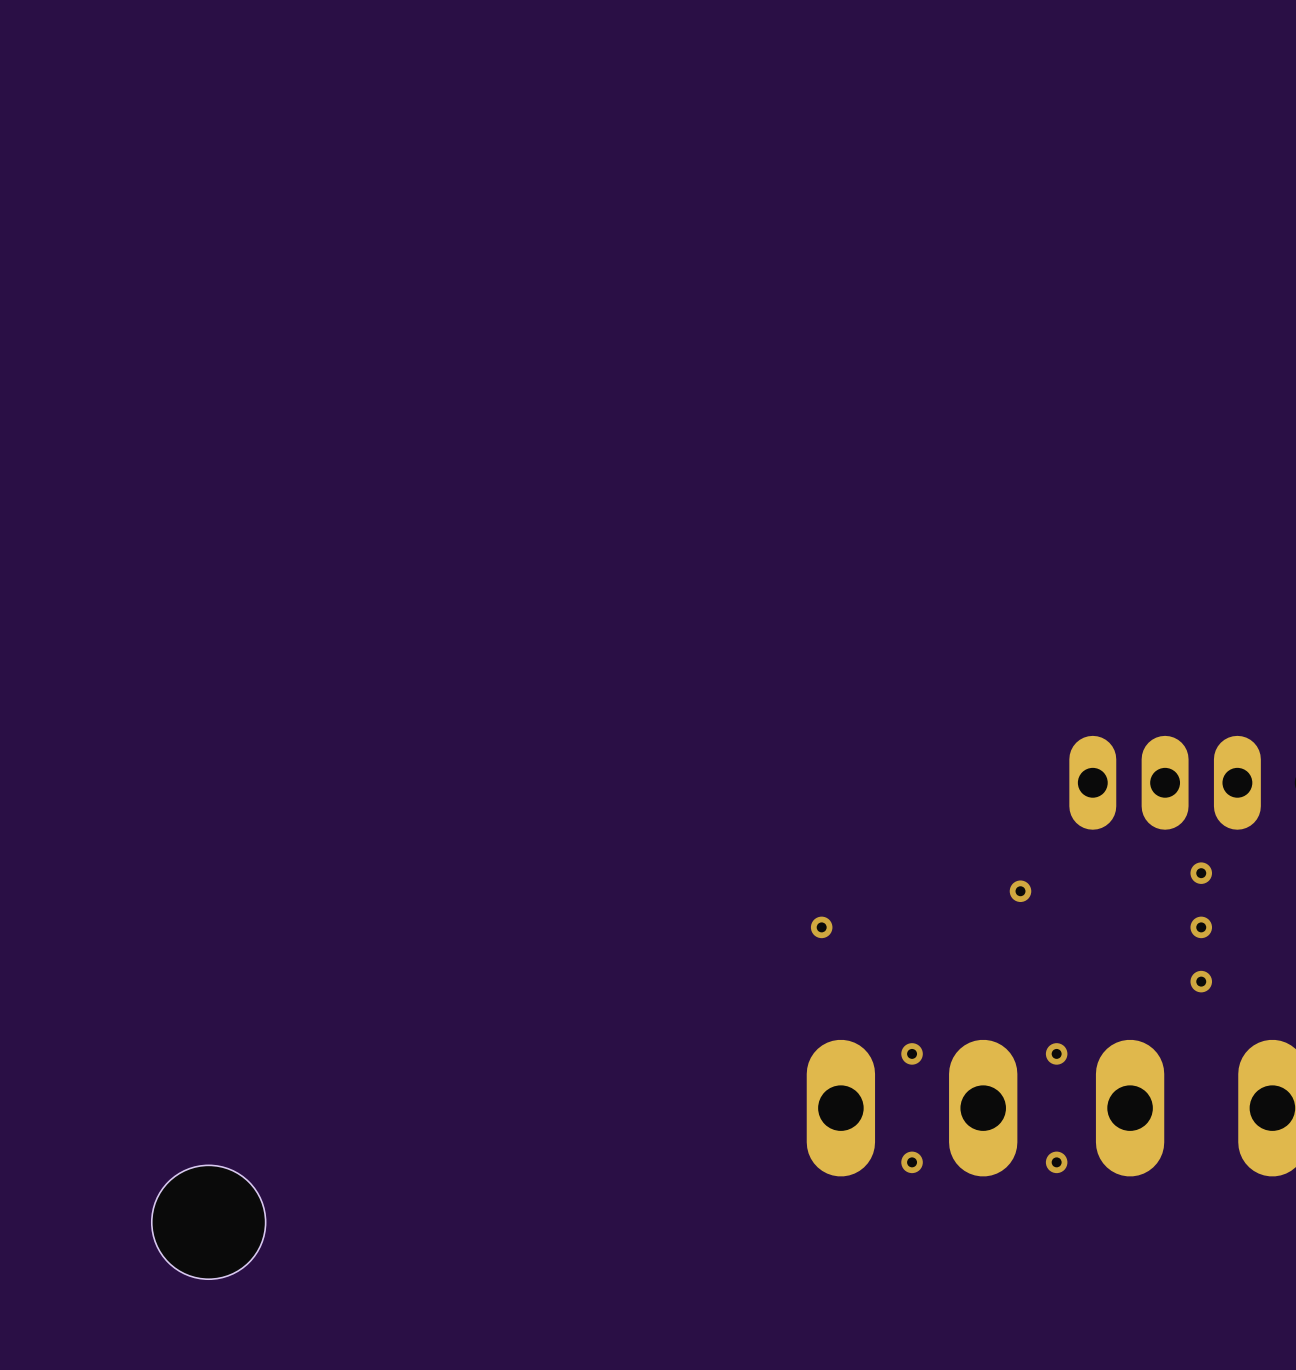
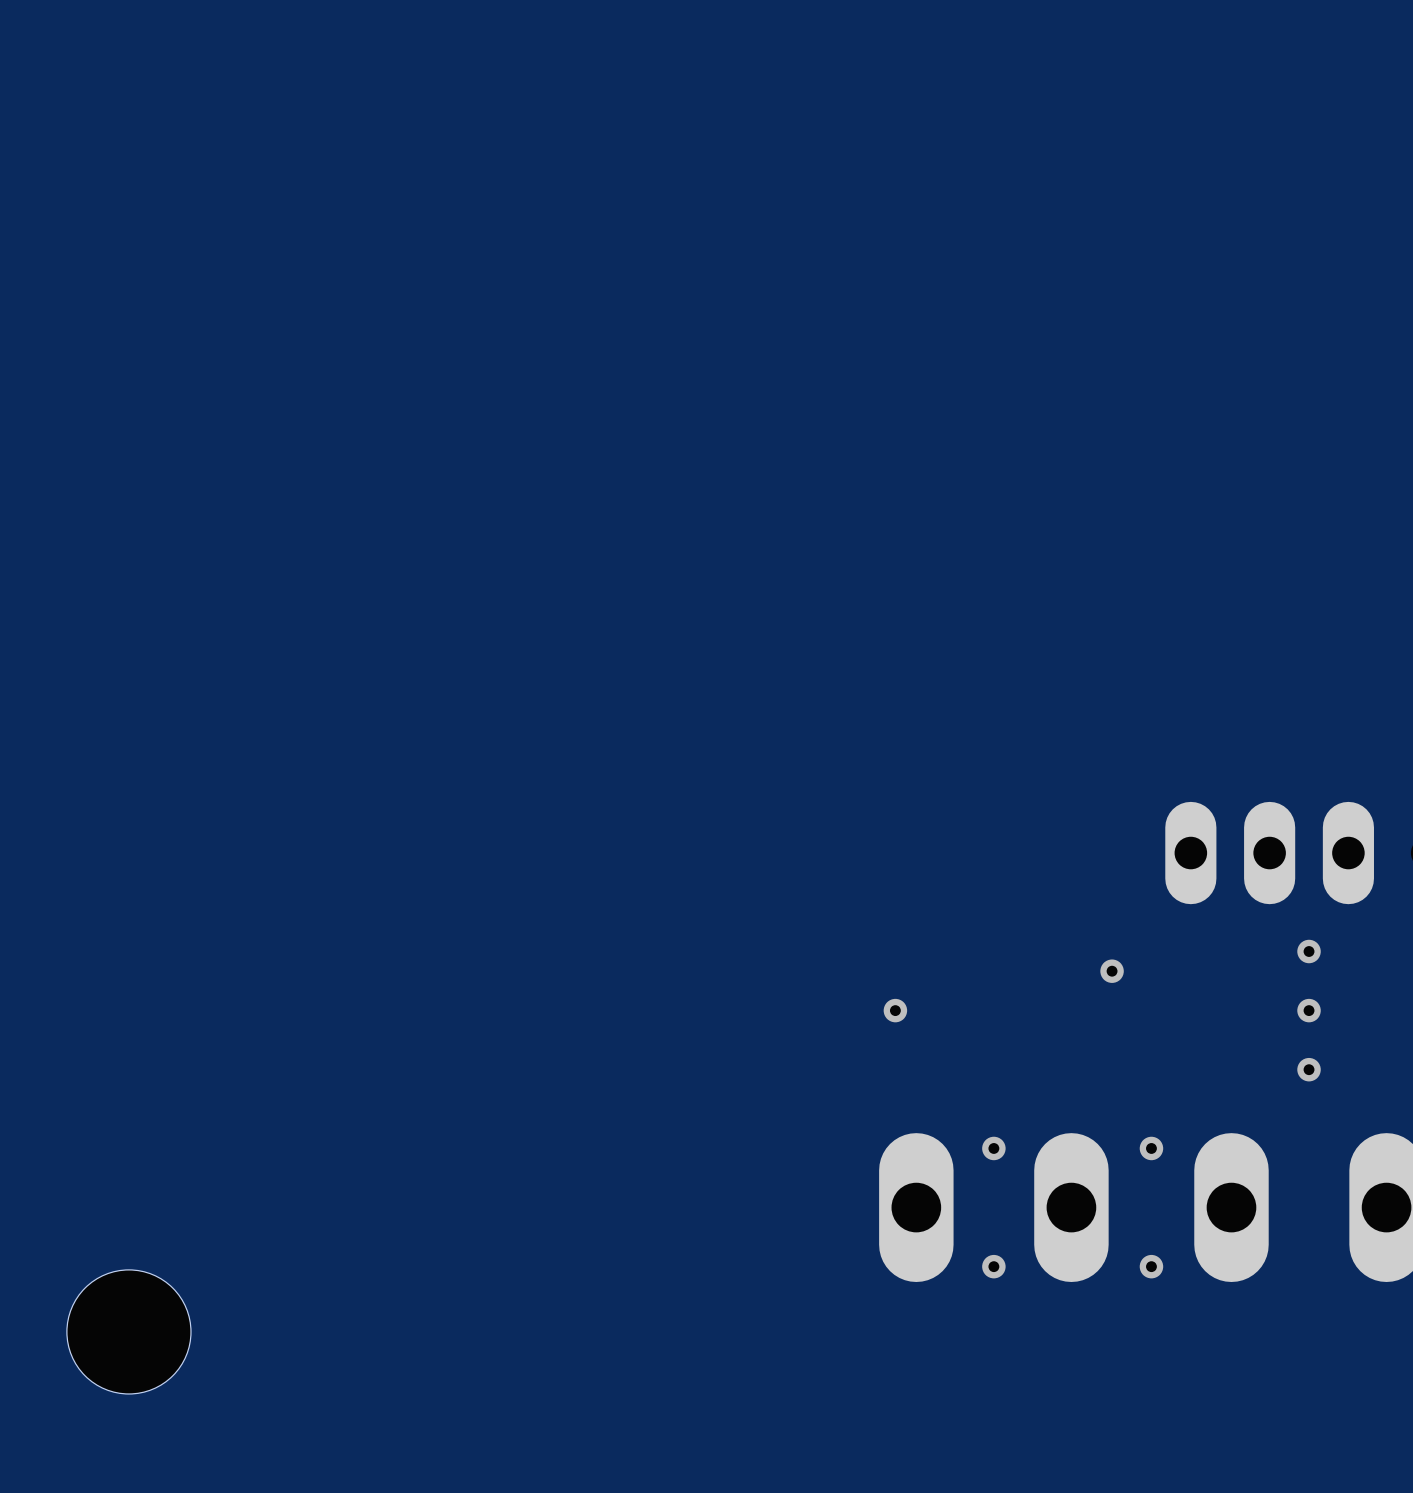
hole position: (208, 1222) -> (128, 1331)

